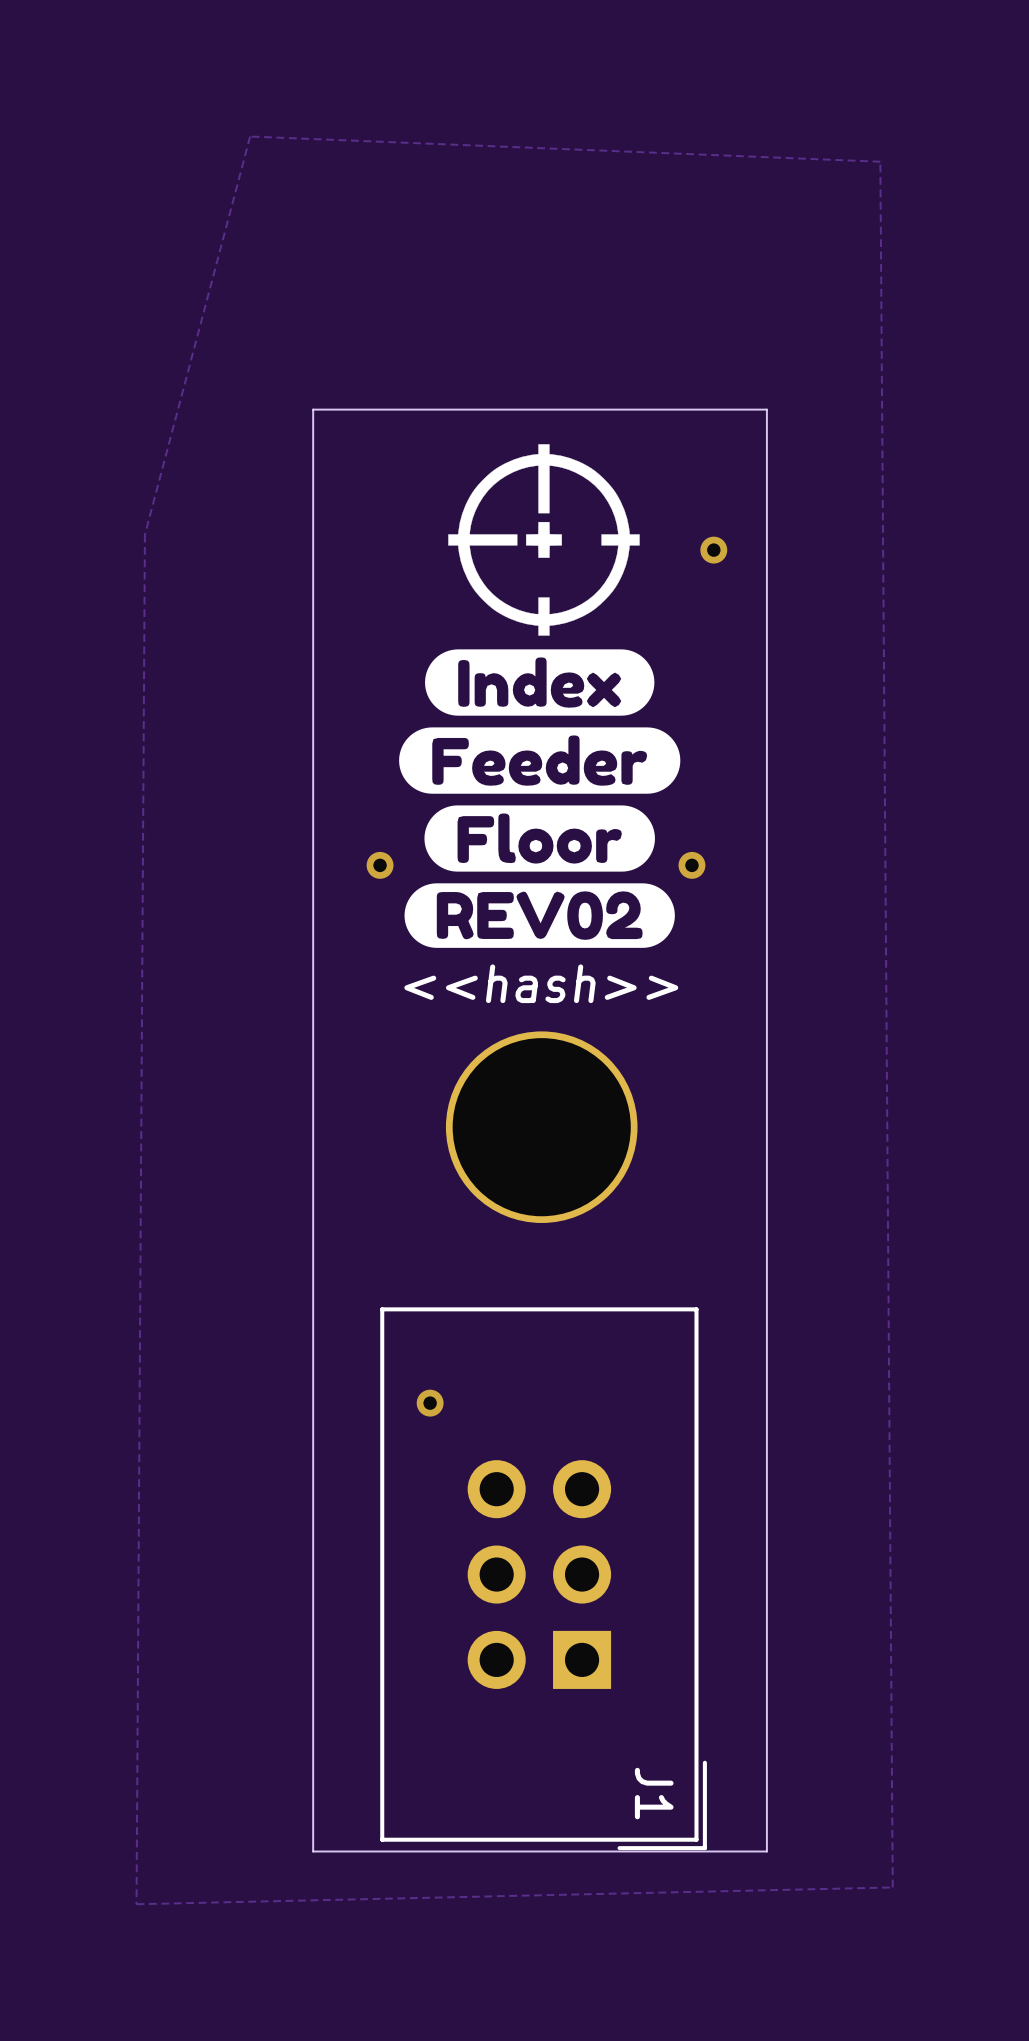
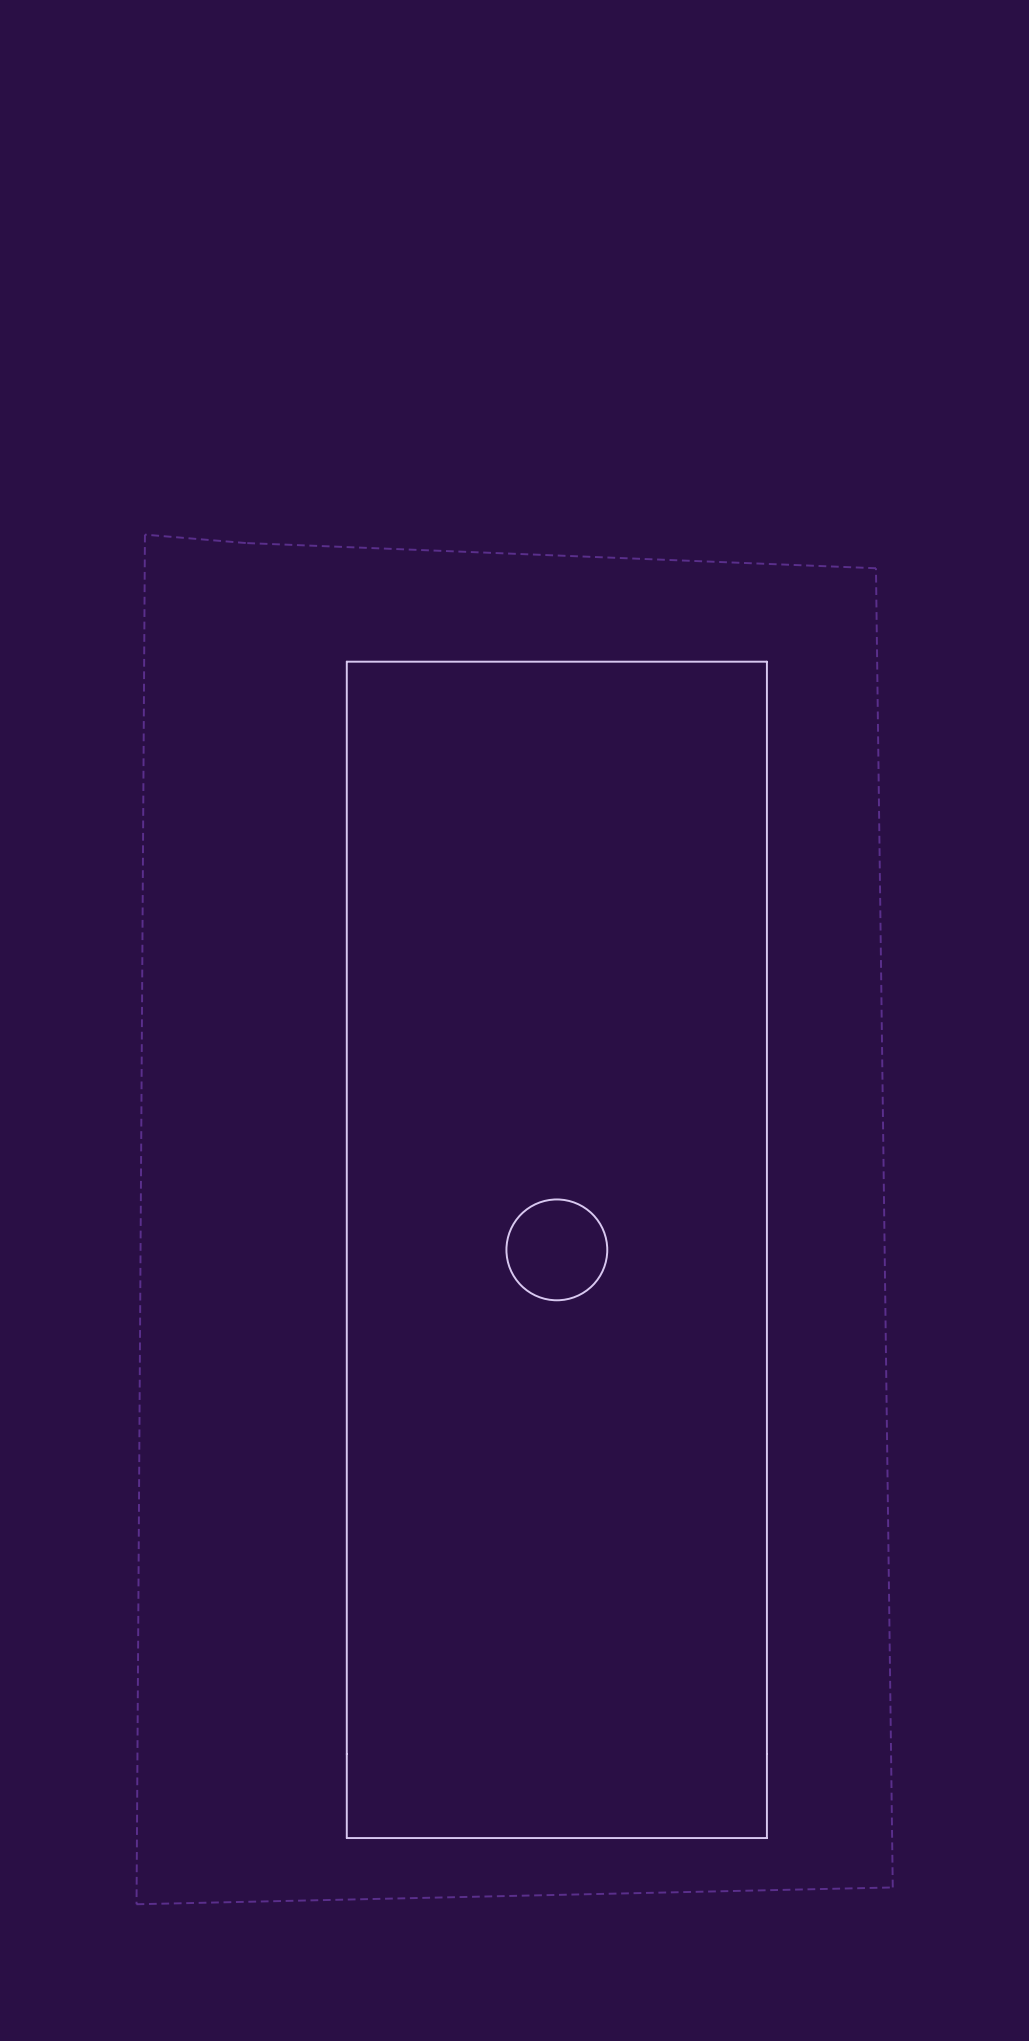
drawing: [399, 444, 681, 948] -> none
zone outline: (144, 534) (250, 136) (880, 161) (892, 1887) -> (144, 534) (245, 543) (875, 568) (892, 1887)
via: (713, 550) -> none
board edge: (766, 661) (766, 409) (313, 409) (313, 1851) (766, 1851) (766, 1838) -> (766, 661) (346, 661) (346, 1838) (766, 1838)
via: (380, 865) -> none
via: (691, 865) -> none
text: <<hash>> (541, 983) -> none
part: (541, 1127) -> none
round board edge: none -> [505, 1198, 609, 1302]
via: (430, 1403) -> none
J1: (543, 1578) -> none

